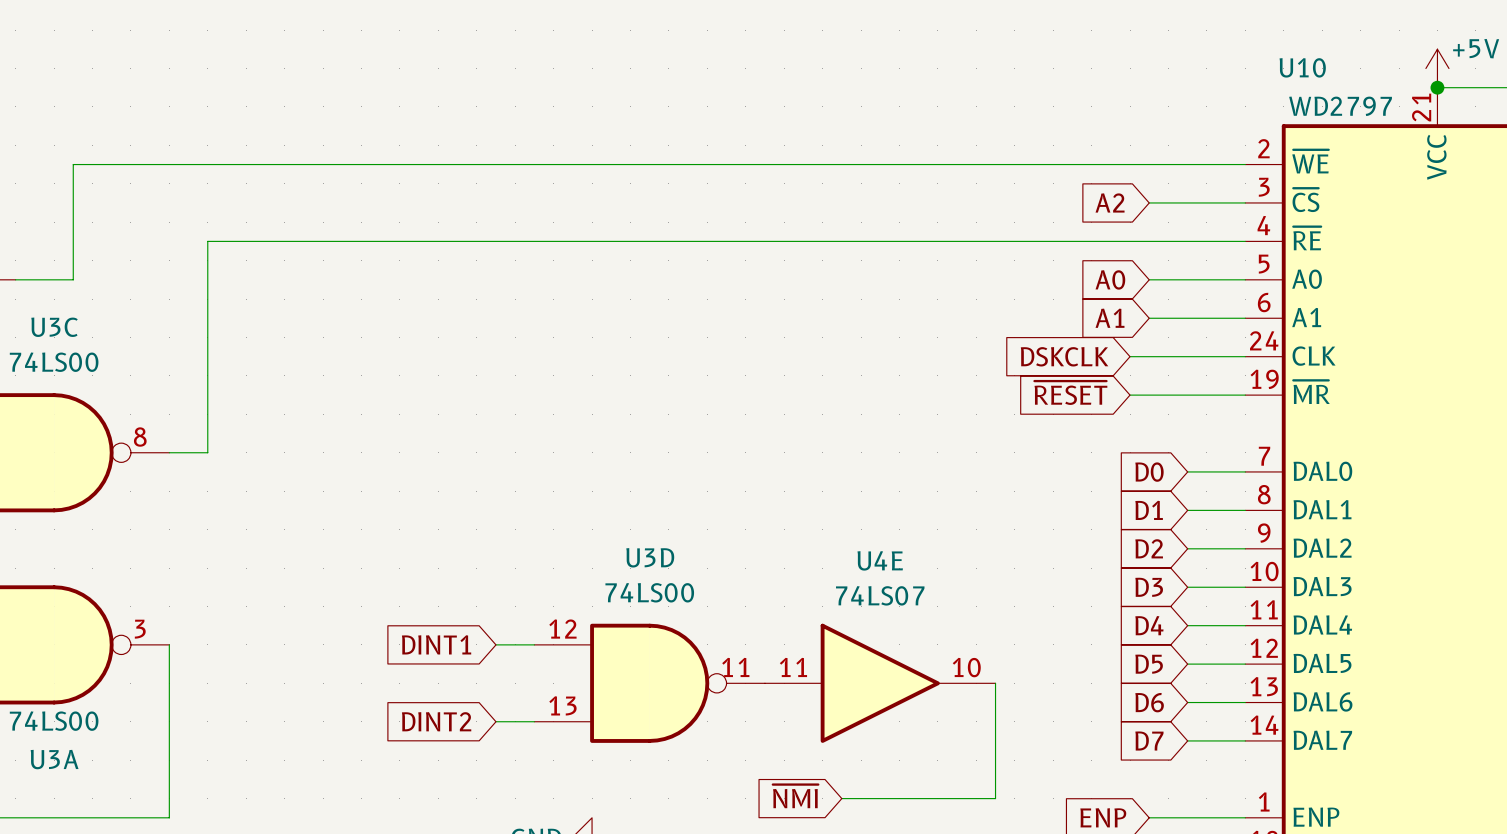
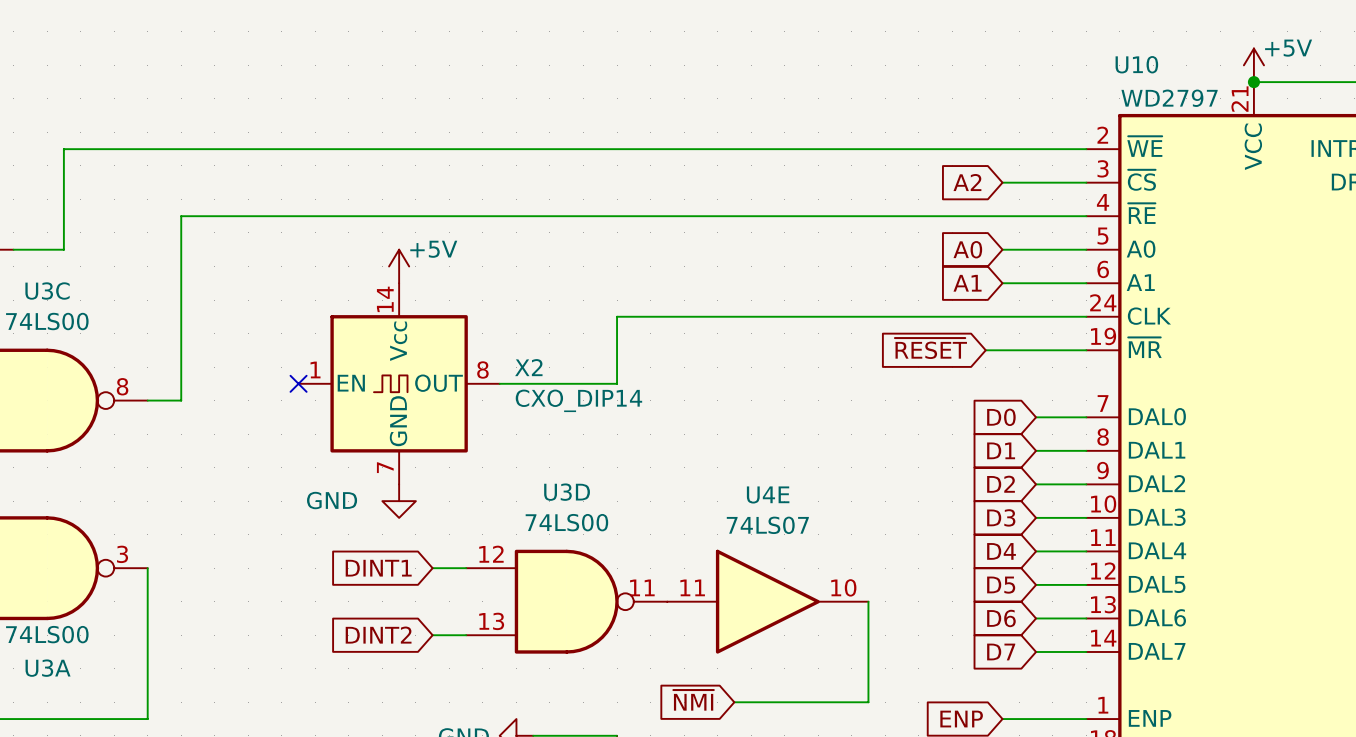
power symbol: none -> +5V (399, 266)
global label: DSKCLK (1064, 356) -> none
wire: none -> (985, 316) (617, 316) (617, 383) (499, 383)
no-connect mark: none -> (298, 383)
X2: none -> CXO_DIP14 (399, 383)
power symbol: none -> GND (399, 501)

